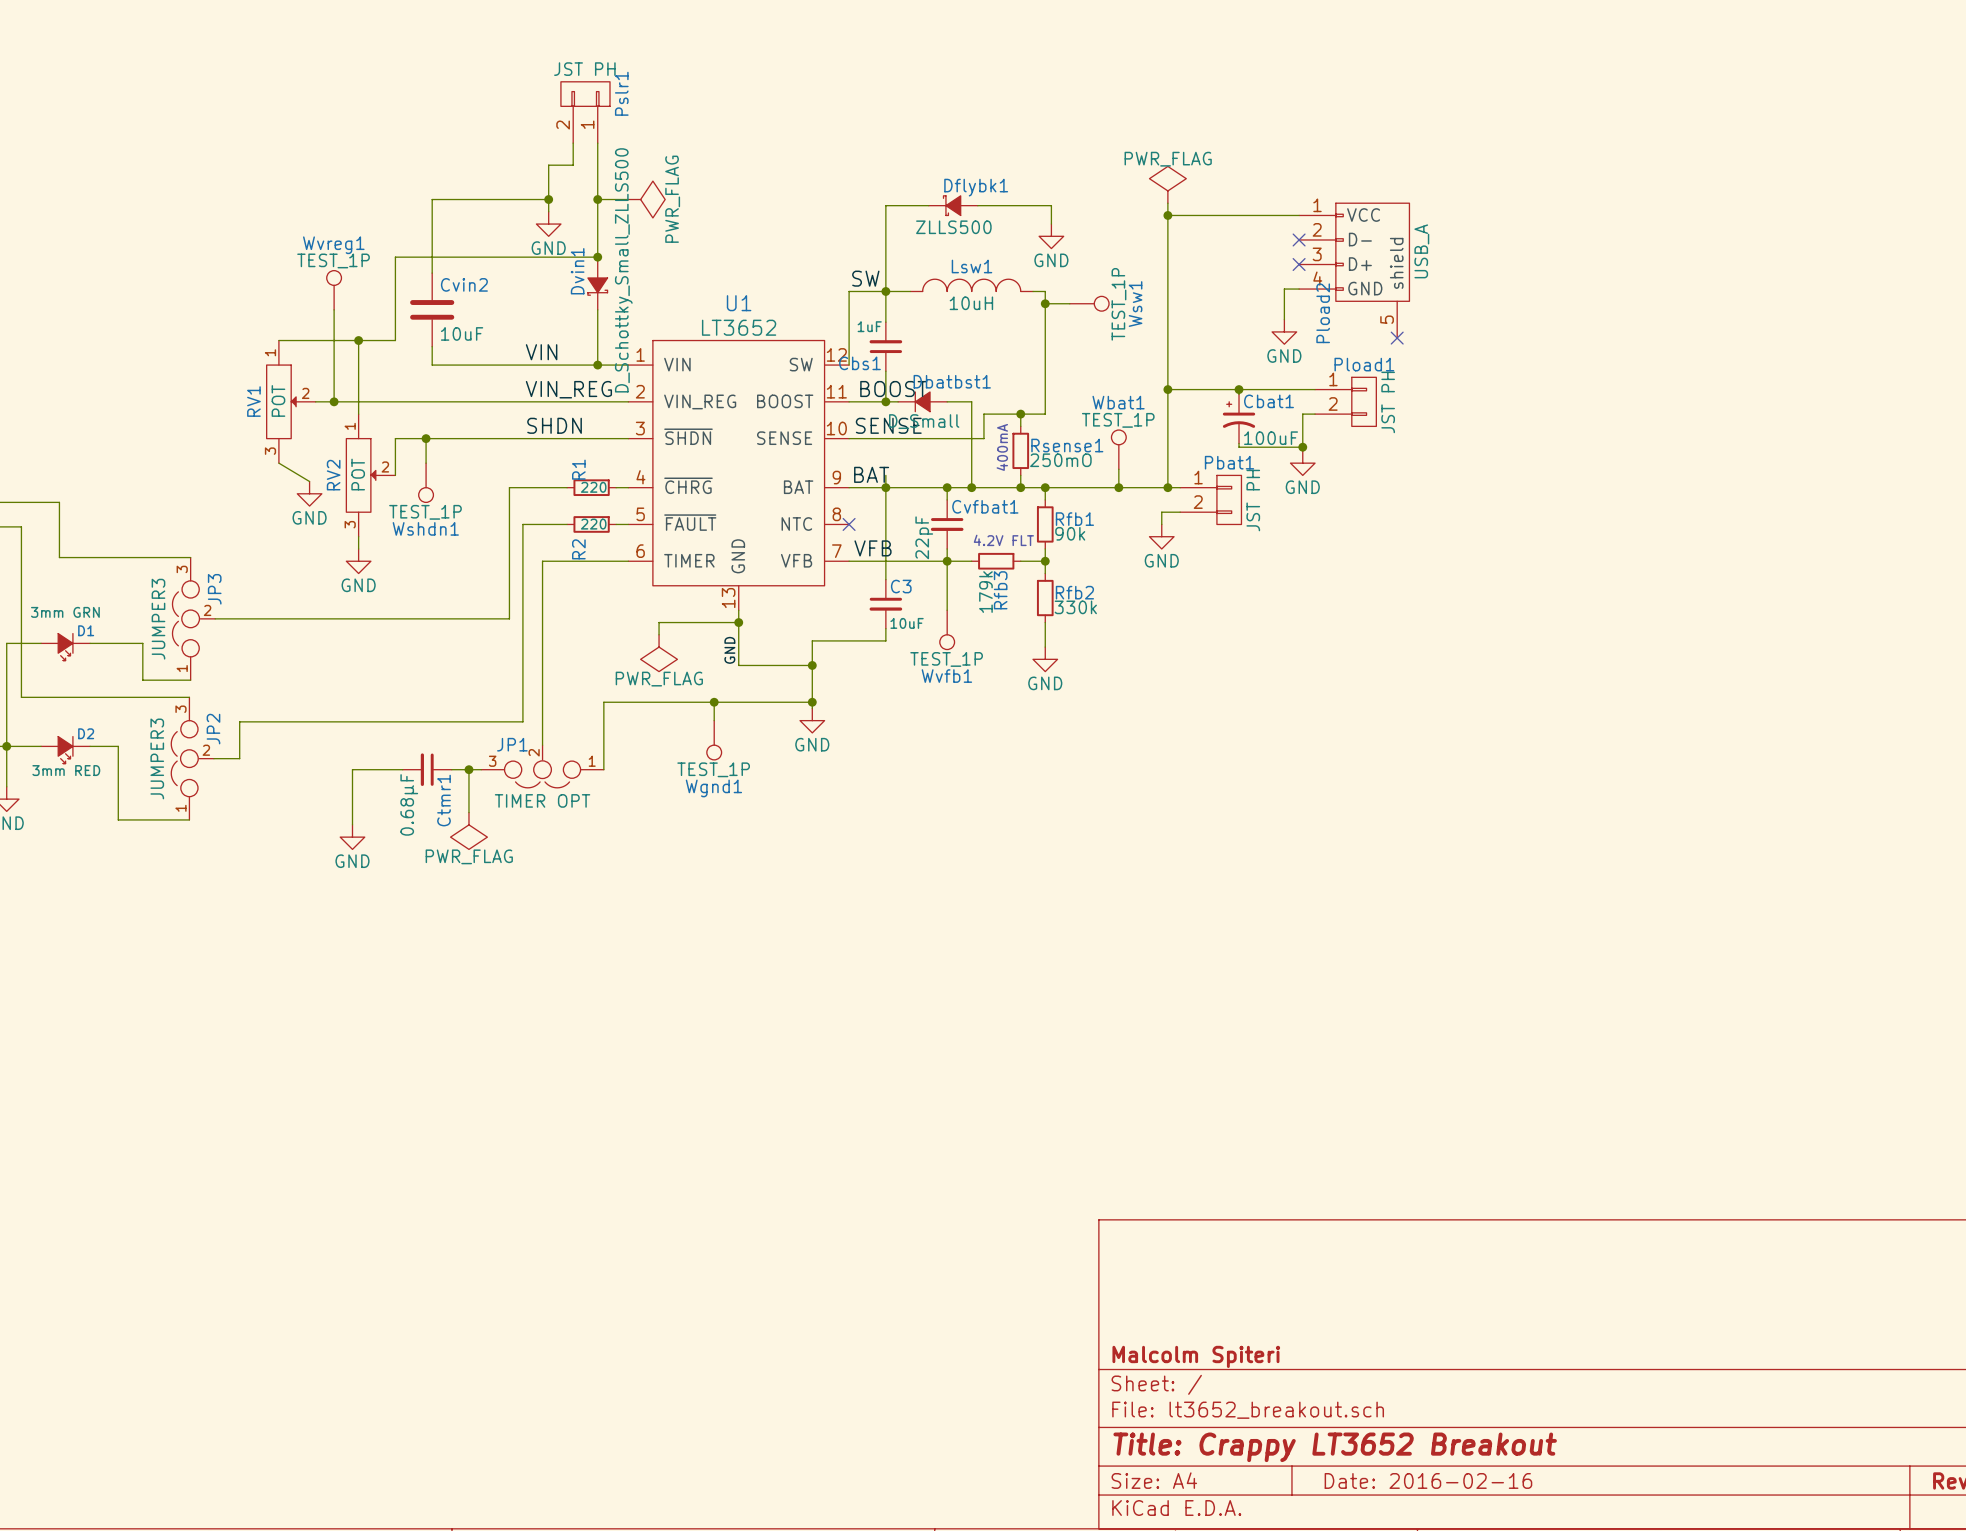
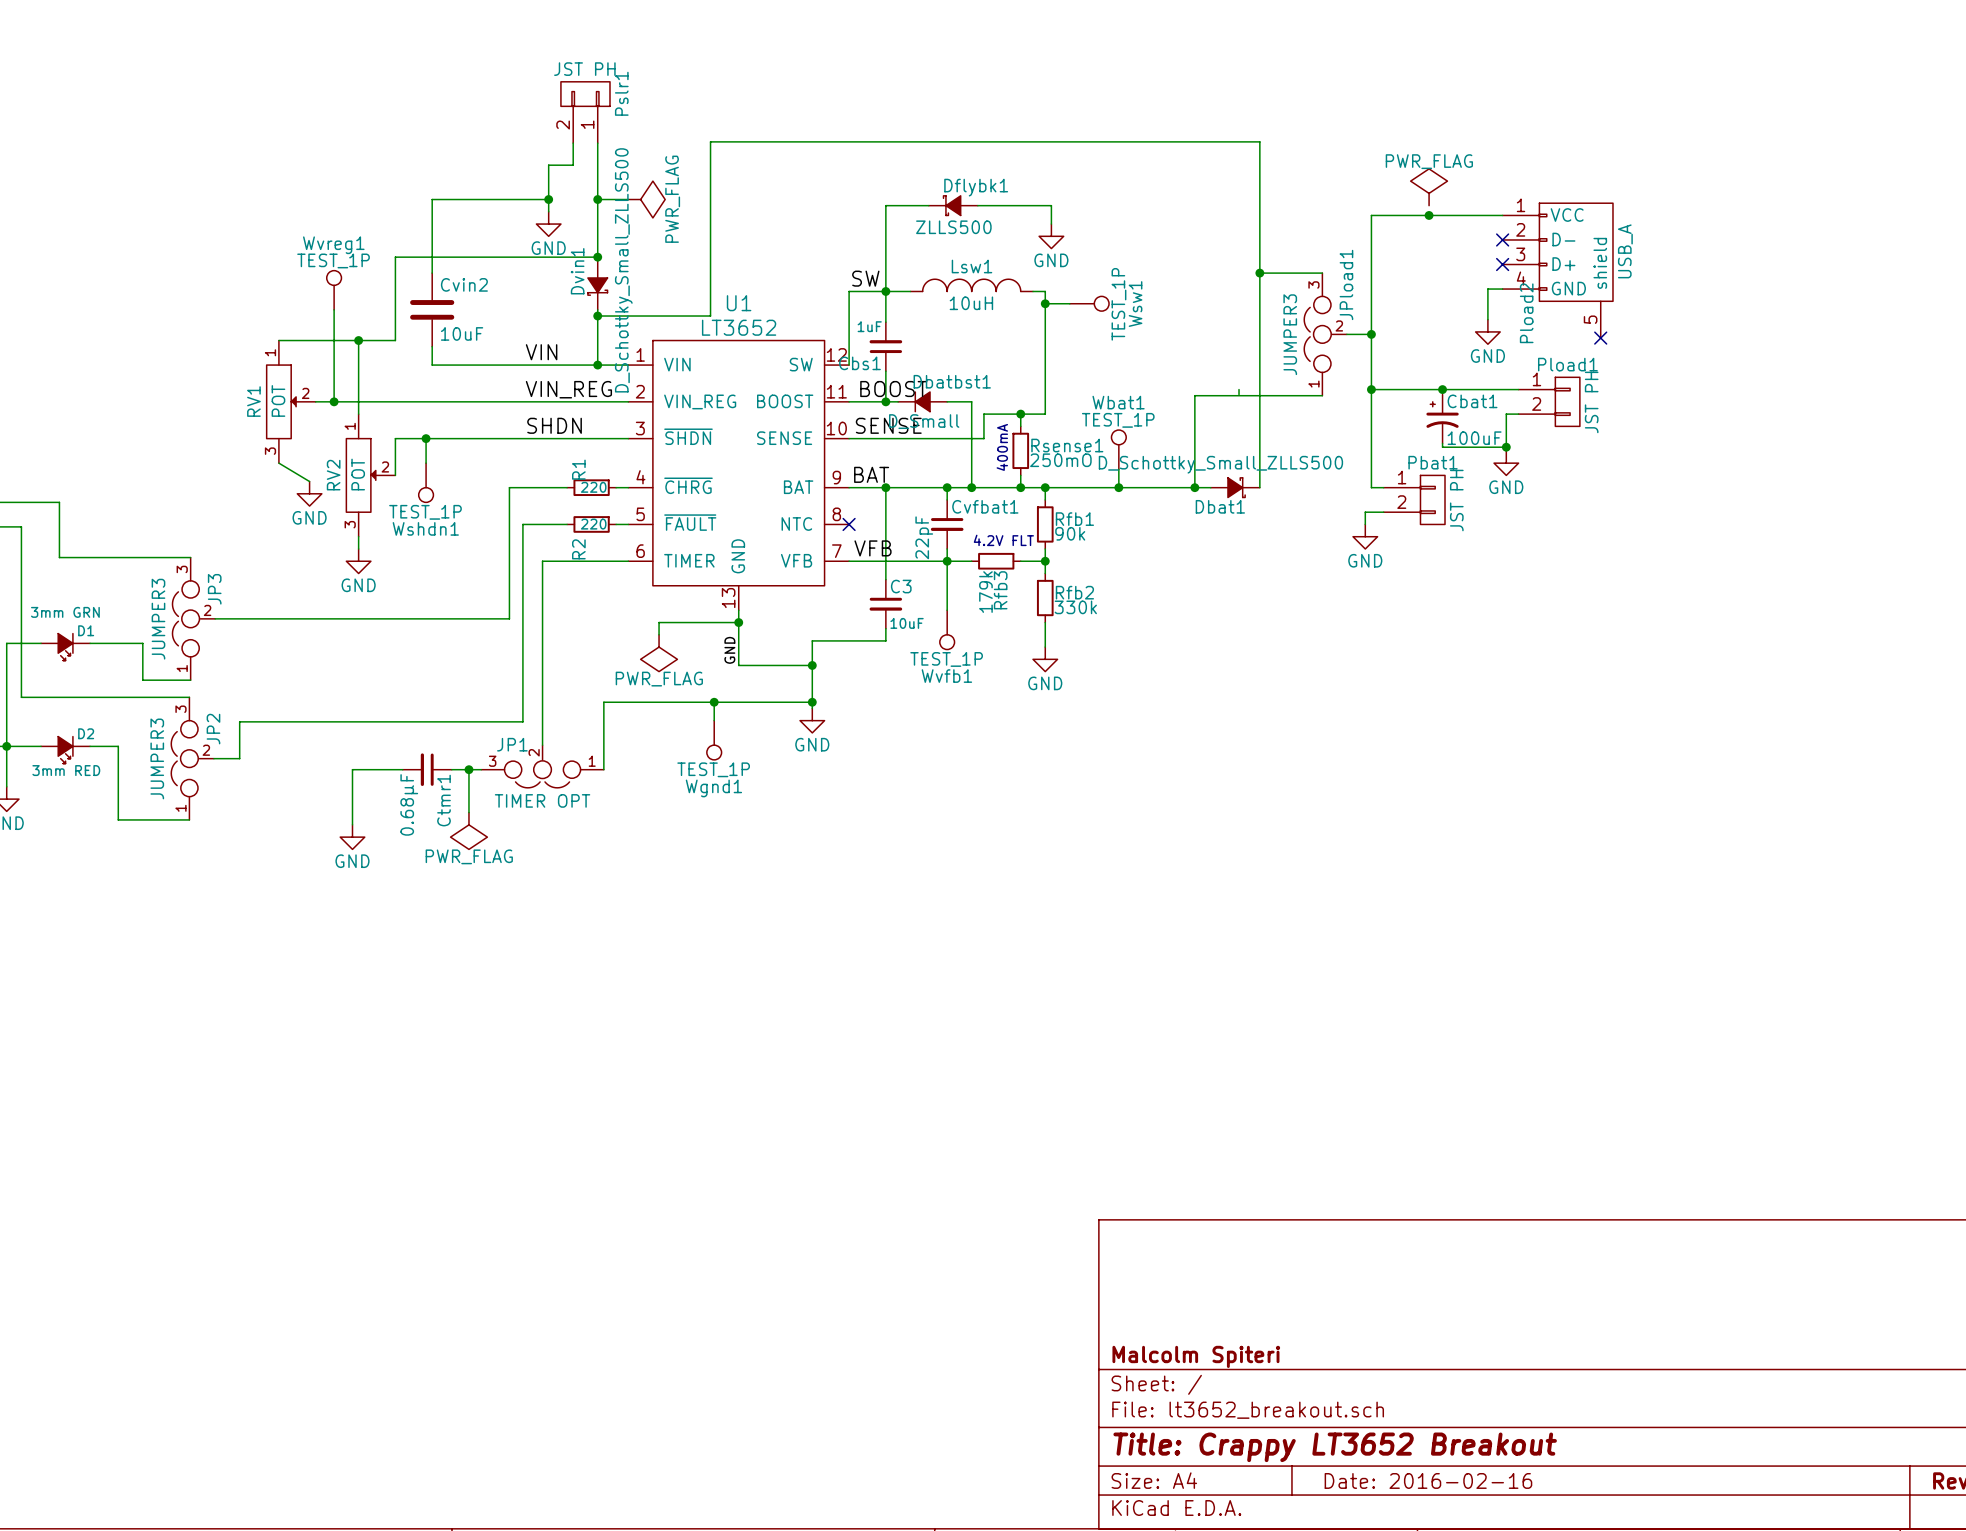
power symbol: PWR_FLAG (1167, 184) -> none
power symbol: none -> PWR_FLAG (1429, 187)
wire: (1167, 203) (1167, 487) -> none
wire: (1167, 215) (1299, 215) -> none
junction: (1167, 215) -> none
junction: none -> (1429, 215)
wire: none -> (1502, 215) (1371, 215) (1371, 487) (1383, 487)
no-connect mark: (1299, 239) -> none
no-connect mark: none -> (1502, 239)
no-connect mark: (1299, 264) -> none
no-connect mark: none -> (1502, 264)
Pload2 position: (1354, 270) -> (1557, 270)
wire: none -> (1259, 273) (1322, 273)
junction: none -> (1259, 273)
wire: (1299, 289) (1284, 289) (1284, 319) -> (1502, 289) (1487, 289) (1487, 319)
wire: none -> (597, 316) (710, 316) (710, 141) (1259, 141) (1259, 487)
junction: none -> (597, 316)
power symbol: GND (1284, 331) -> none
power symbol: none -> GND (1487, 331)
JPload1: none -> JUMPER3 (1325, 334)
wire: none -> (1346, 334) (1371, 334)
junction: none -> (1371, 334)
no-connect mark: (1397, 338) -> none
no-connect mark: none -> (1600, 338)
wire: (1167, 389) (1315, 389) -> (1371, 389) (1518, 389)
junction: (1167, 389) -> none
junction: (1239, 389) -> none
junction: none -> (1371, 389)
junction: none -> (1442, 389)
wire: none -> (1322, 395) (1194, 395) (1194, 487)
Pload1 position: (1345, 401) -> (1549, 401)
wire: (1315, 414) (1302, 414) (1302, 450) -> (1518, 414) (1506, 414) (1506, 450)
Cbat1 position: (1239, 419) -> (1442, 419)
wire: (1239, 443) (1239, 447) (1302, 447) -> (1442, 443) (1442, 447) (1506, 447)
junction: (1302, 447) -> none
junction: none -> (1506, 447)
power symbol position: GND (1302, 463) -> GND (1365, 536)
power symbol: none -> GND (1506, 463)
wire: (885, 475) (885, 487) -> none
junction position: (1167, 487) -> (1194, 487)
Dbat1: none -> D_Schottky_Small_ZLLS500 (1235, 487)
Pbat1 position: (1210, 499) -> (1414, 499)
wire: (1180, 512) (1161, 512) (1161, 524) -> (1383, 512) (1365, 512) (1365, 524)
power symbol: GND (1161, 536) -> none

